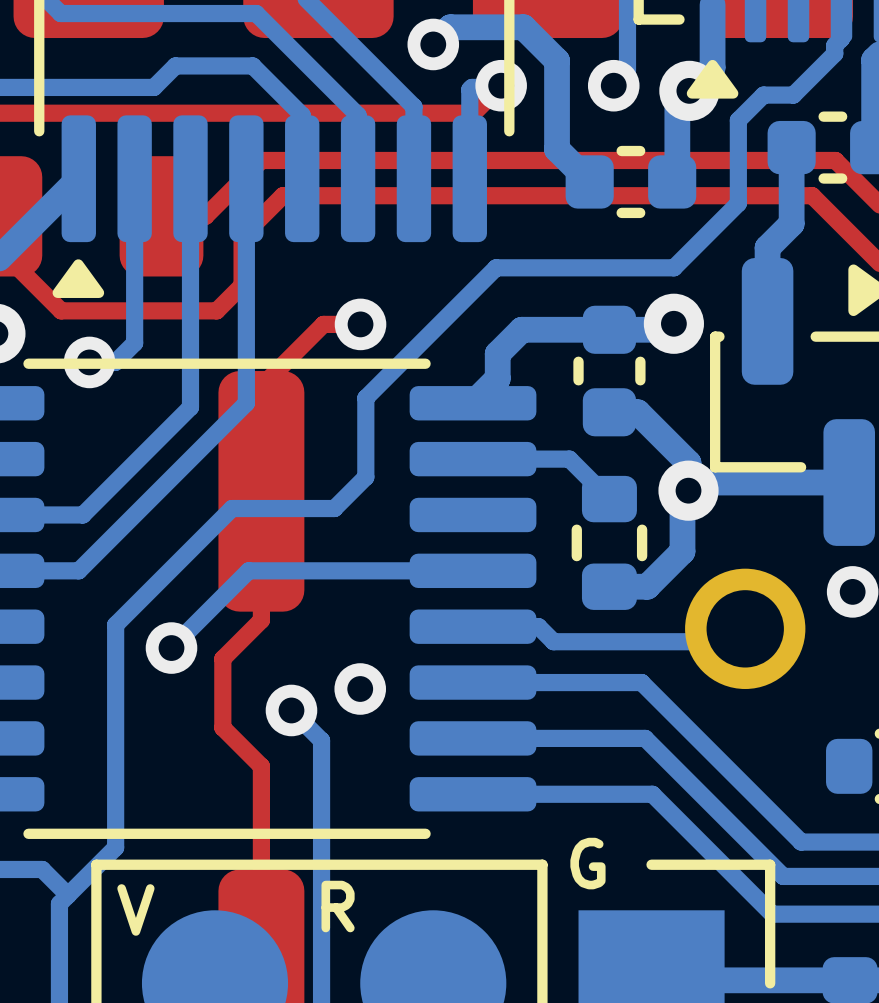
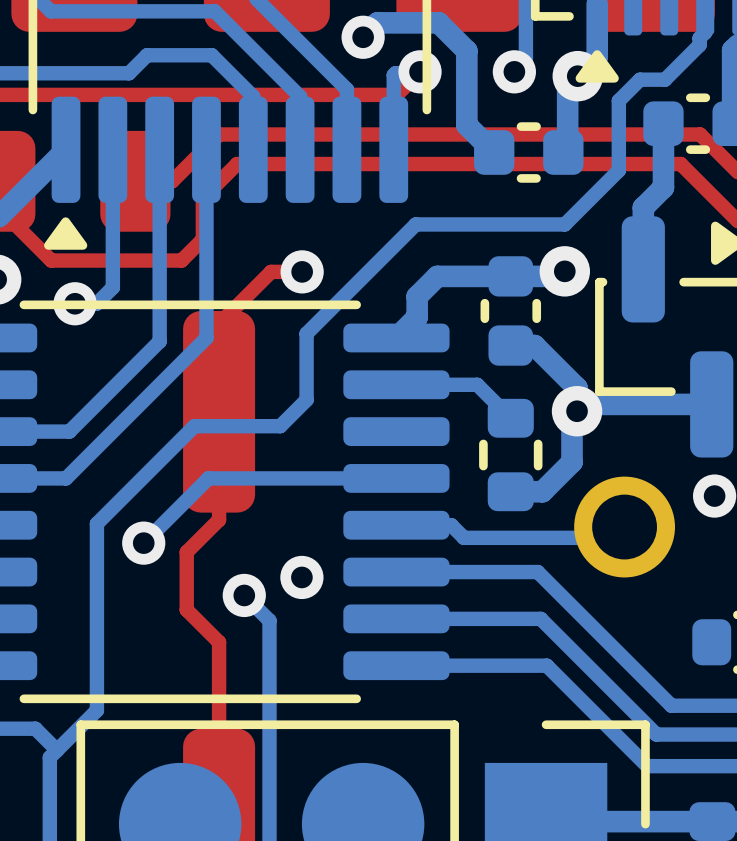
text: G (587, 863) -> none
text: R (338, 906) -> none
text: V (135, 909) -> none

